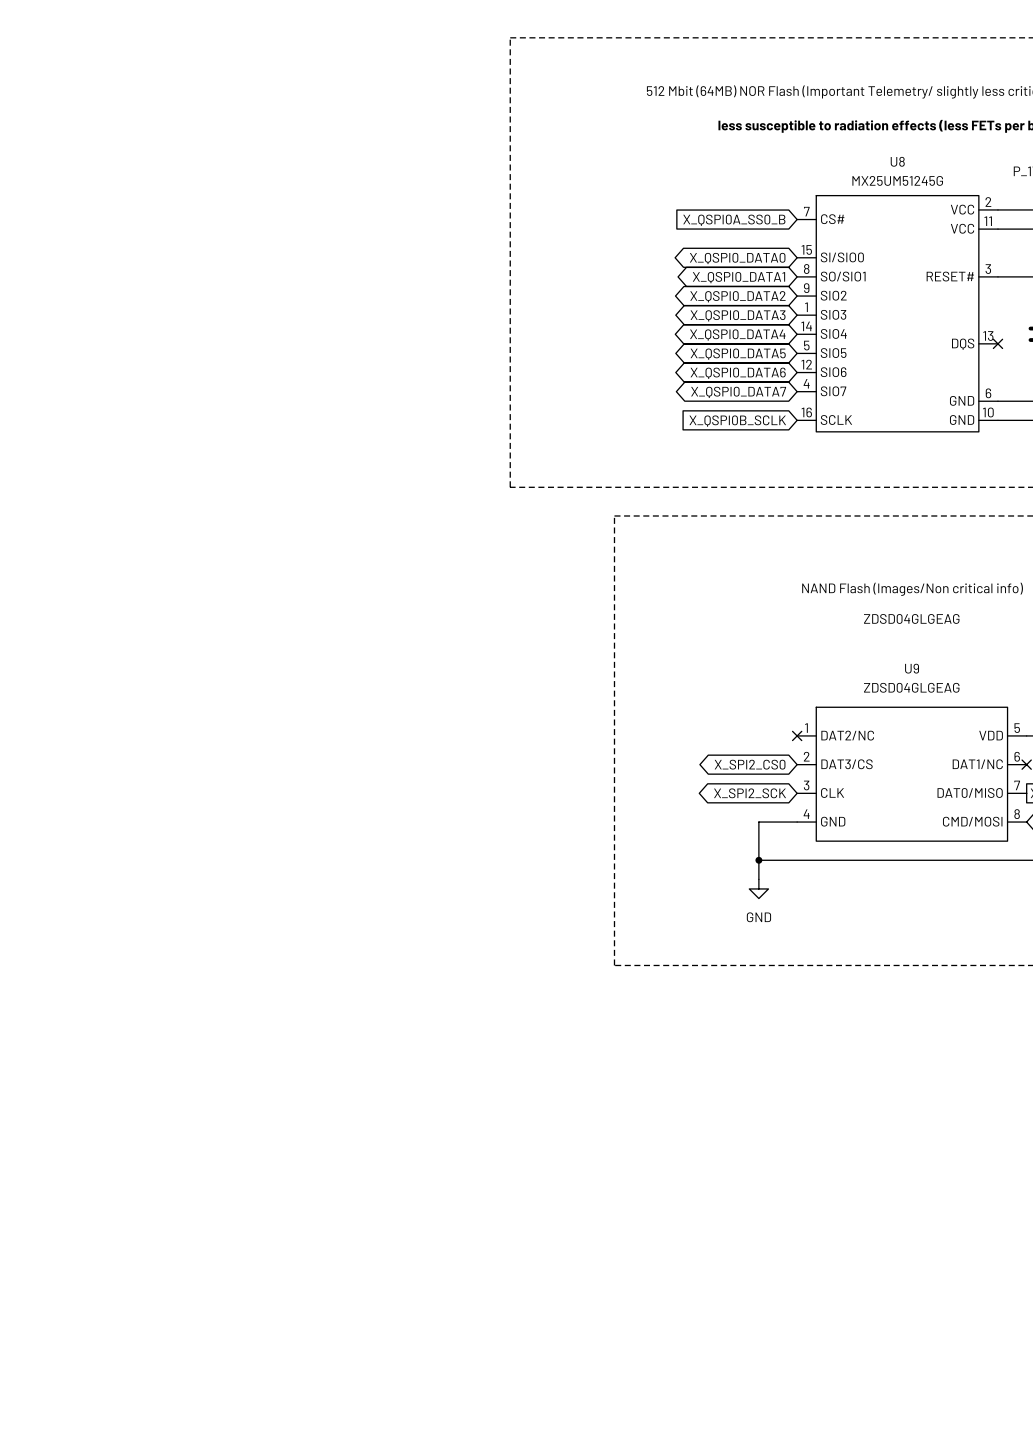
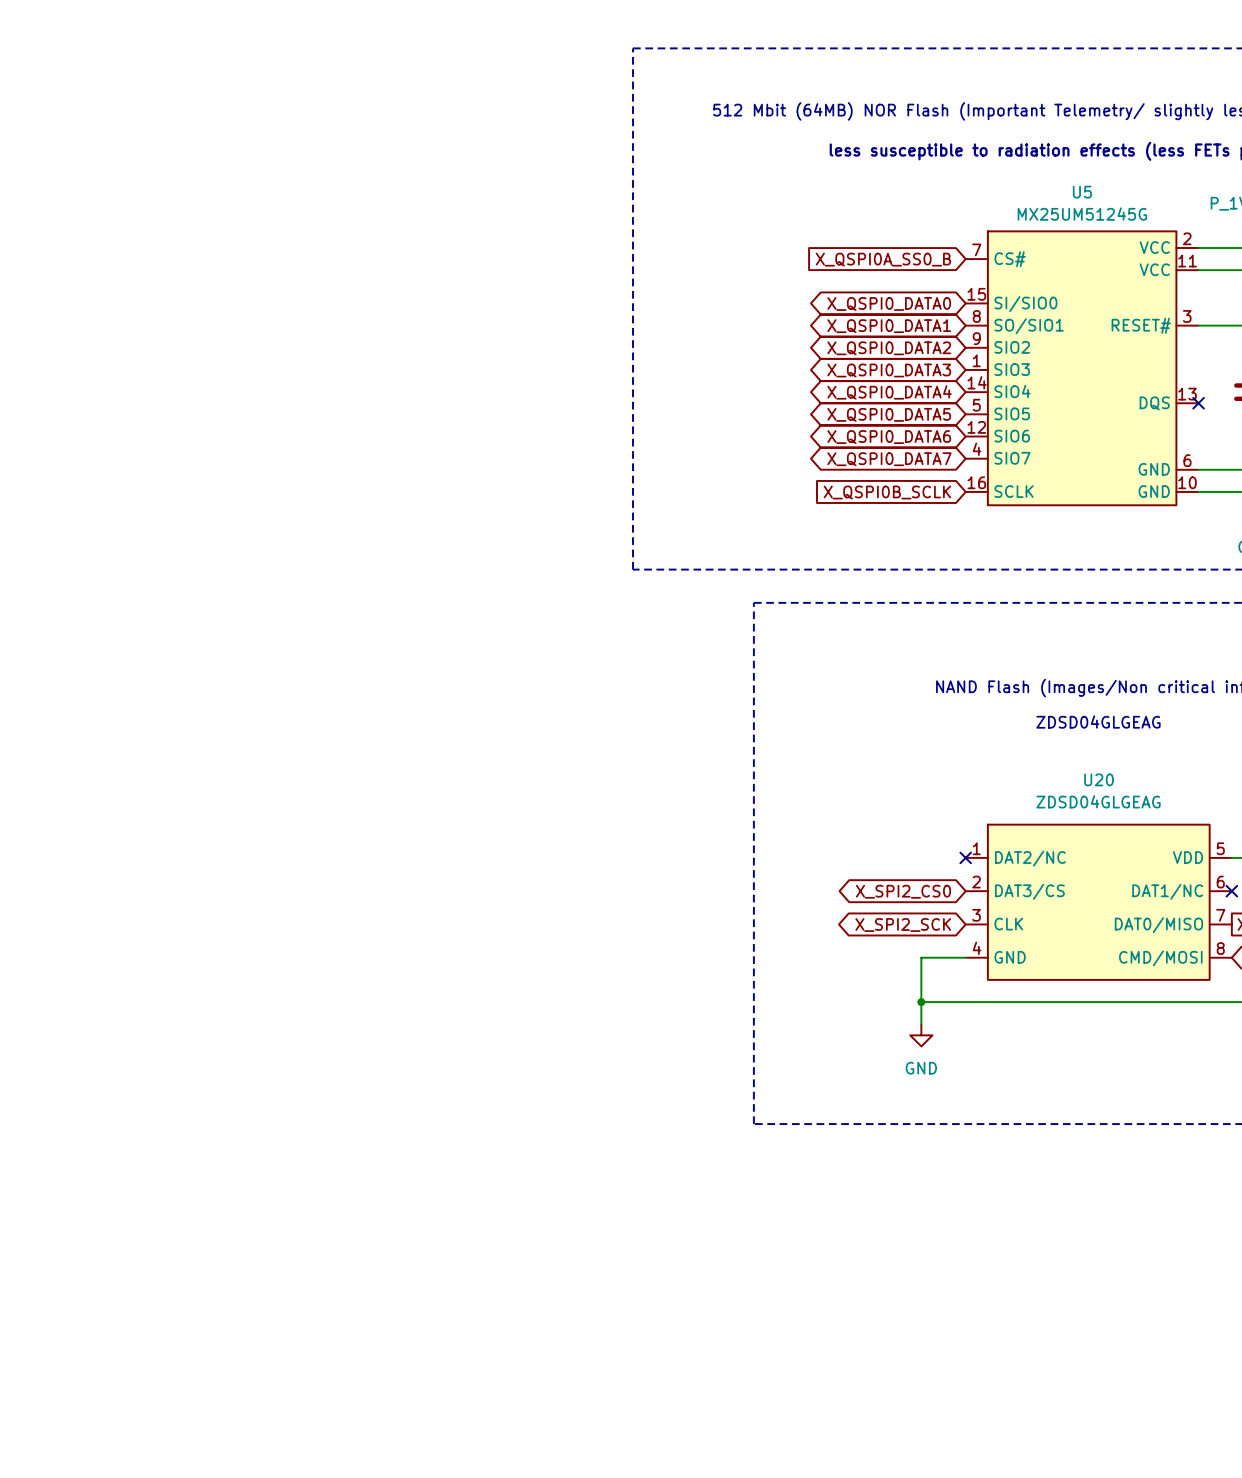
U8 name: U8 (897, 161) -> U5 (1082, 192)
U9 name: U9 (912, 668) -> U20 (1099, 779)

